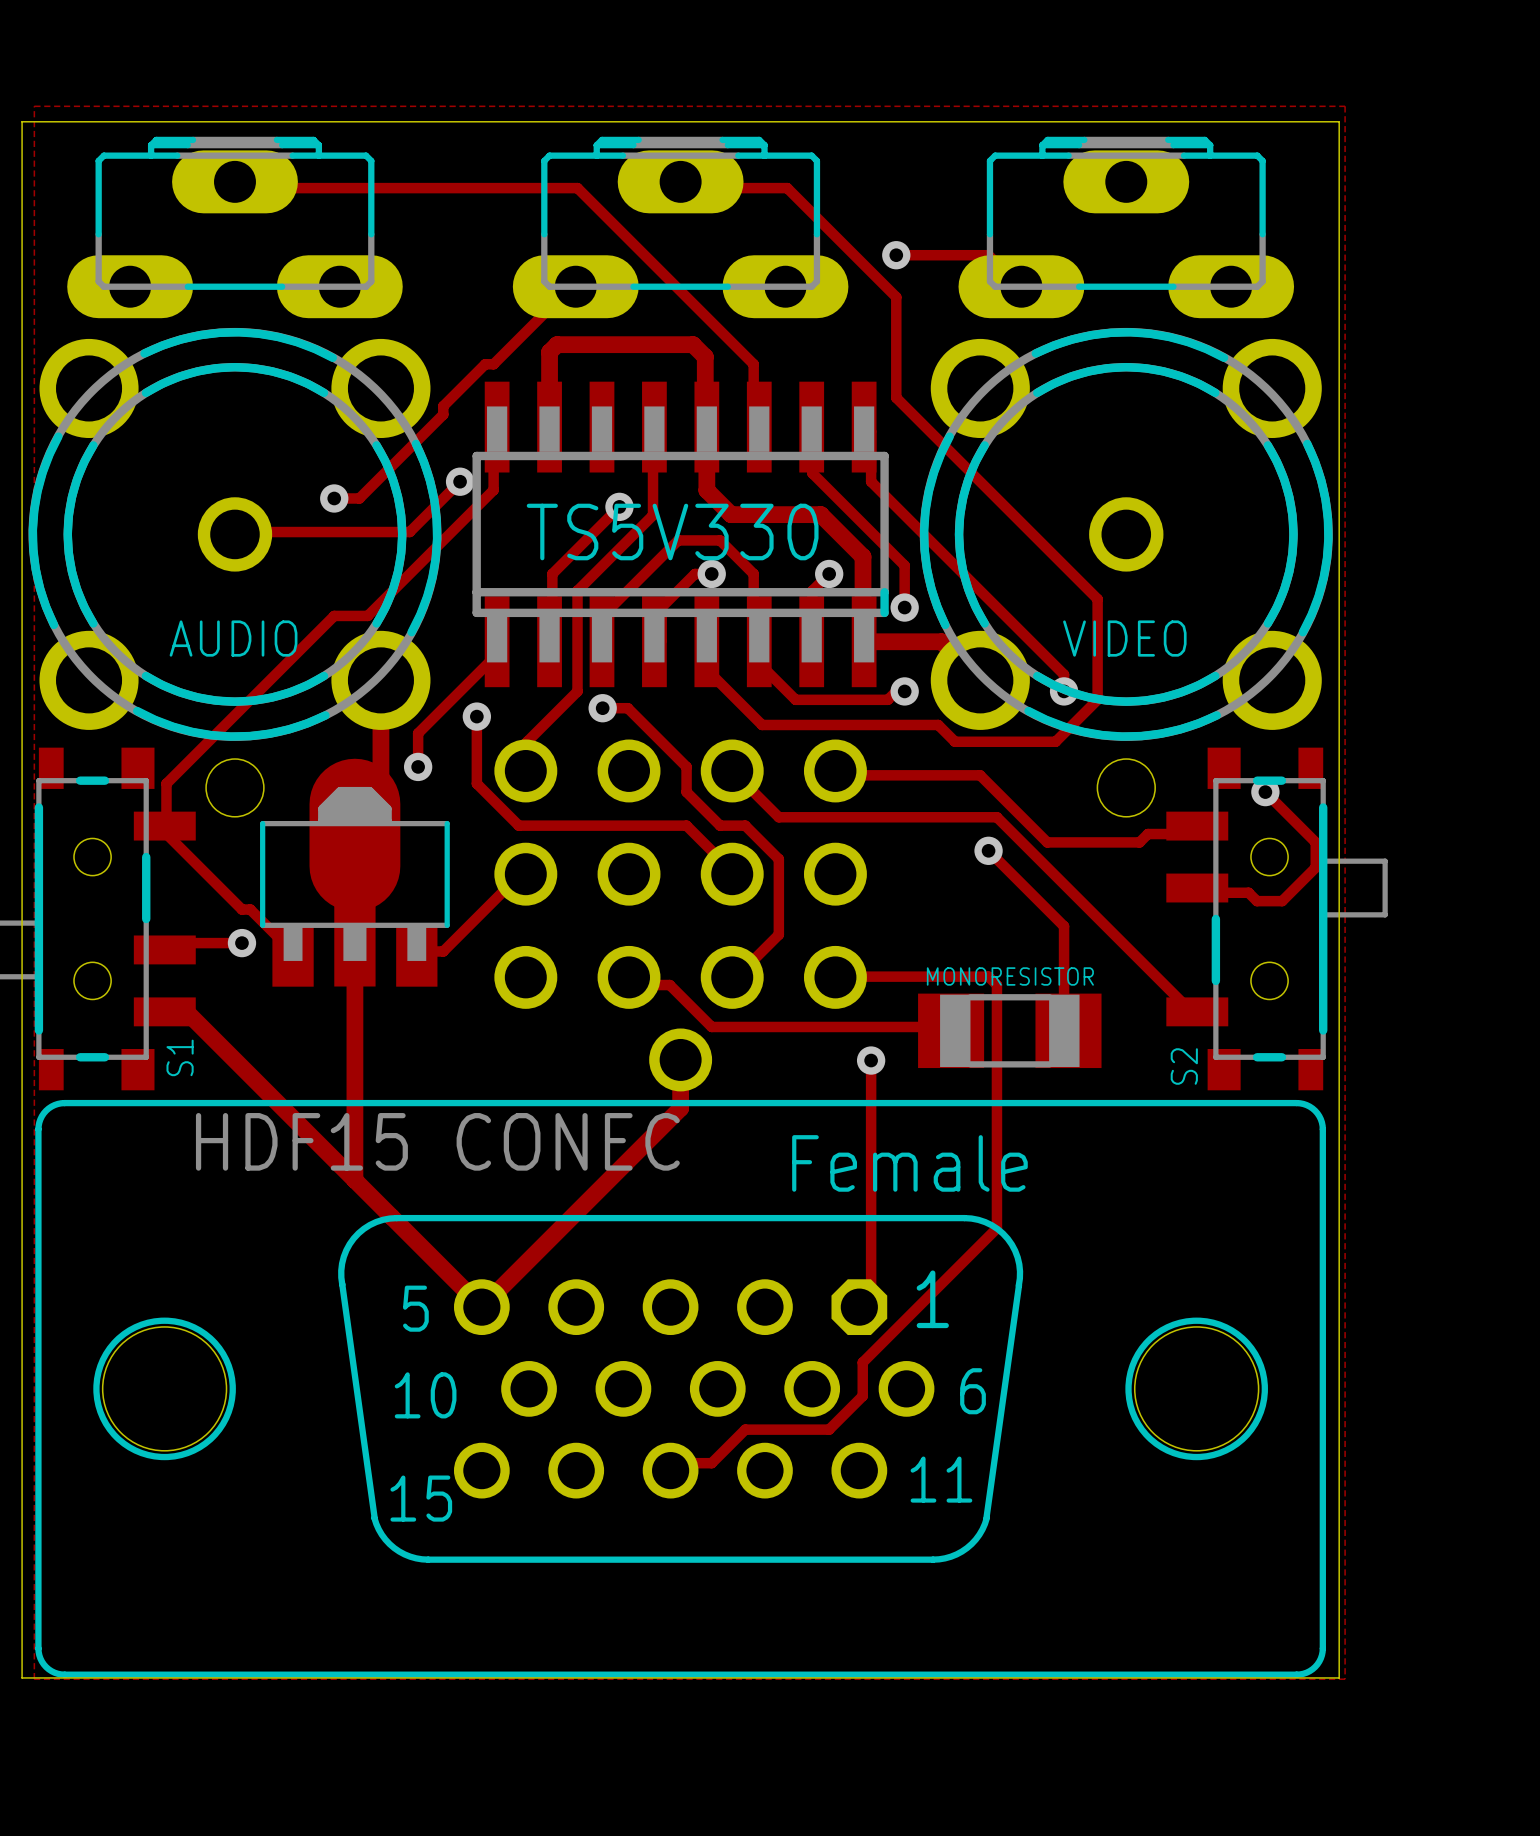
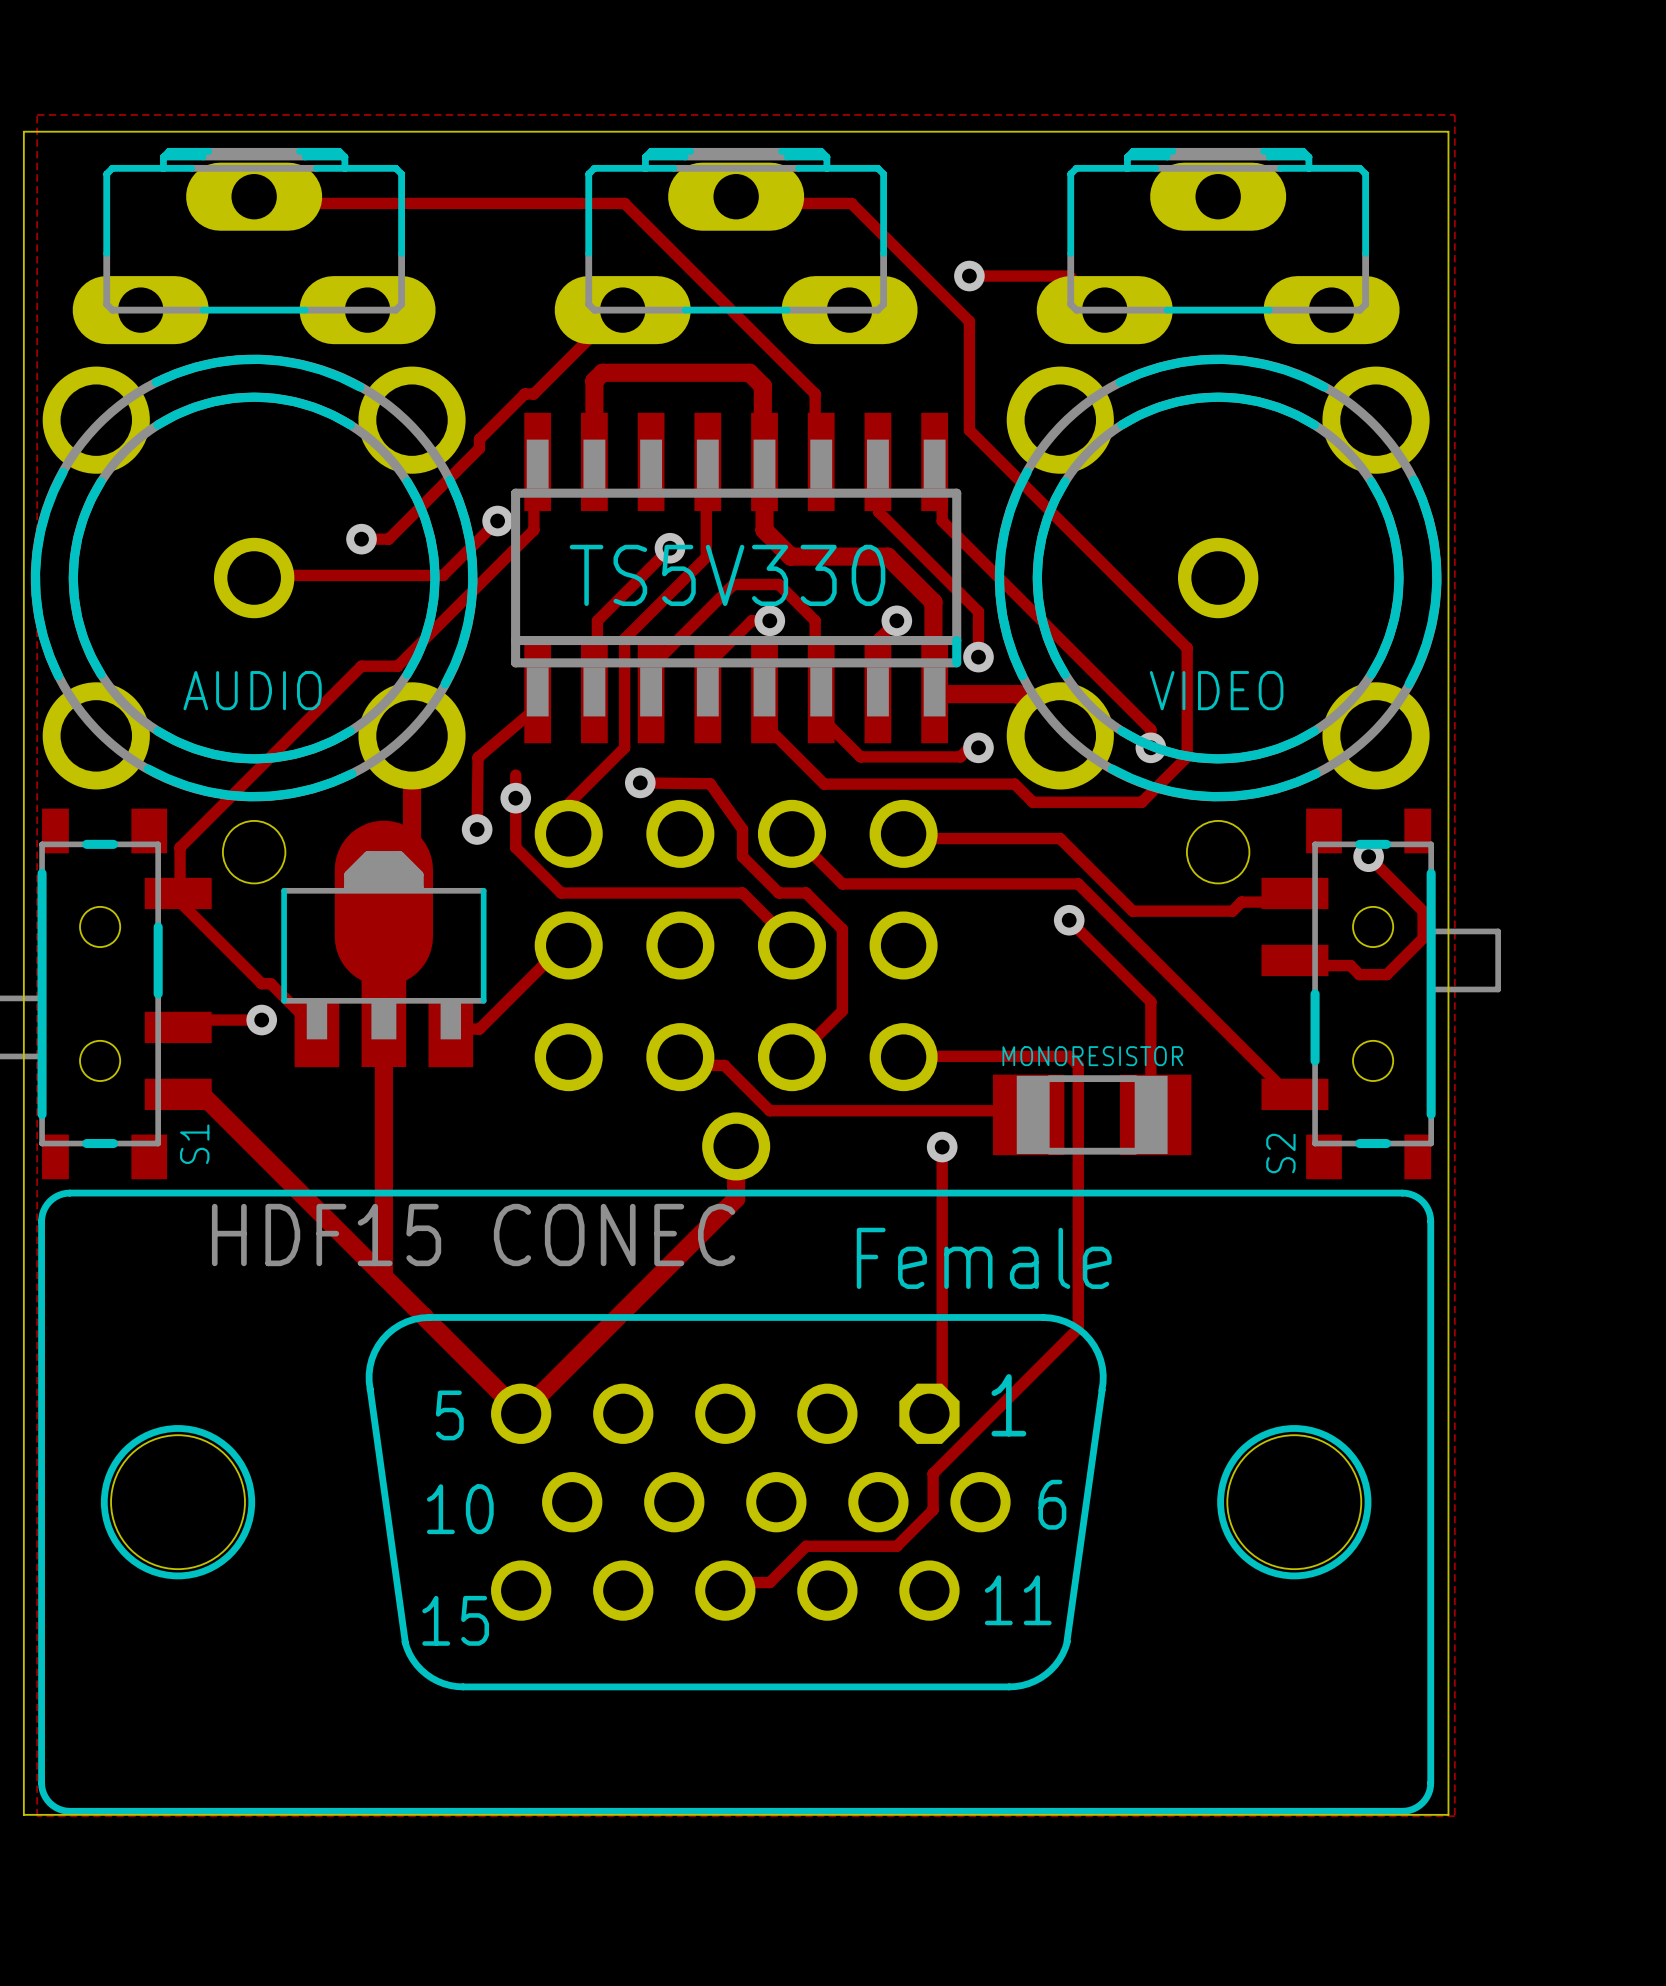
track: (502, 649) (418, 733) (418, 766) -> (542, 702) (478, 757) (477, 829)
track: (602, 708) (627, 708) (686, 766) -> (640, 782) (710, 783) (742, 829)
via position: (602, 708) -> (640, 782)
via position: (476, 716) -> (515, 798)
via position: (418, 766) -> (477, 829)

